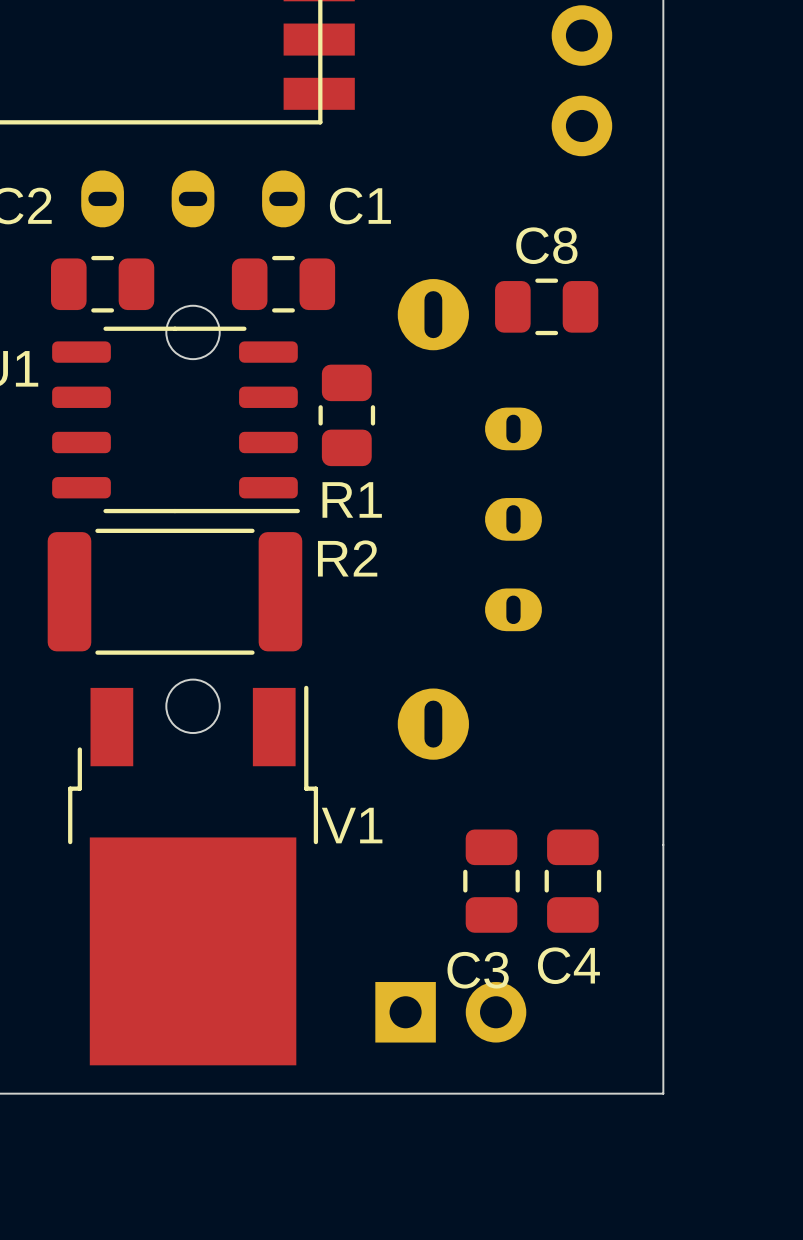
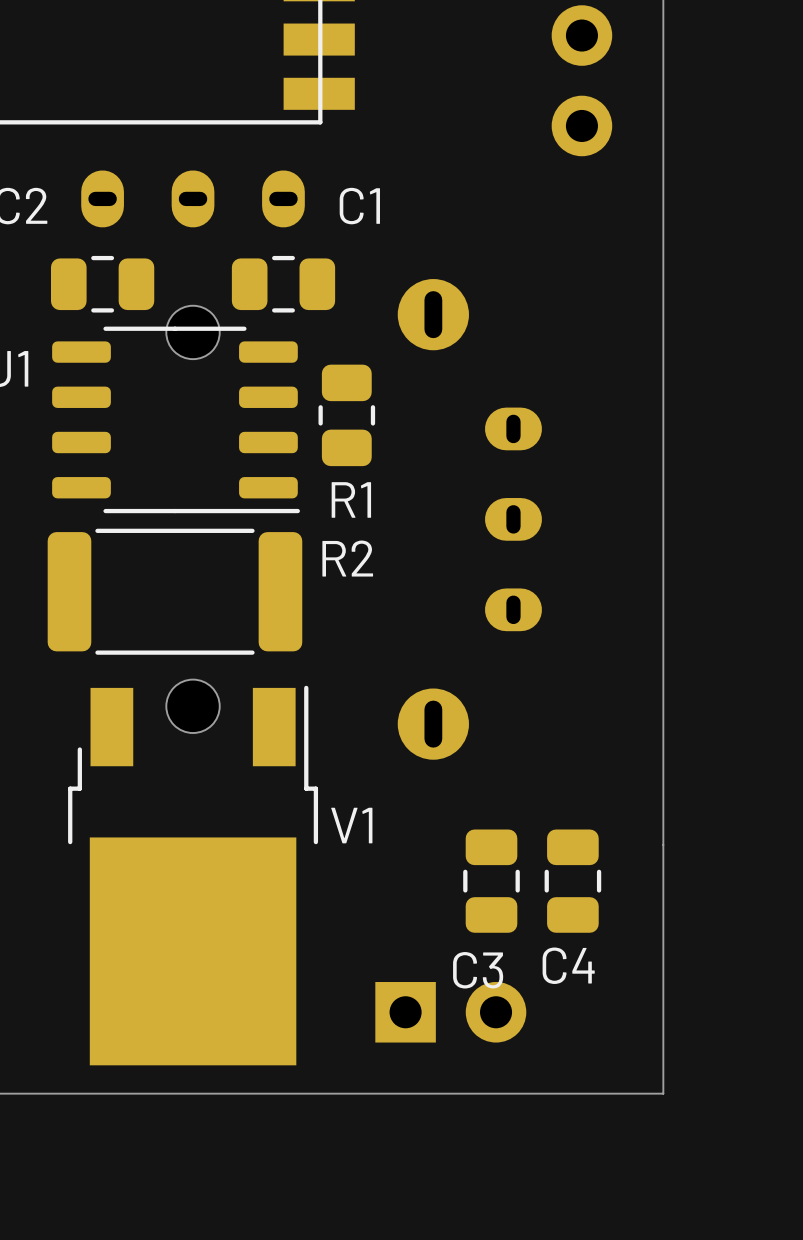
C8: (546, 306) -> none

